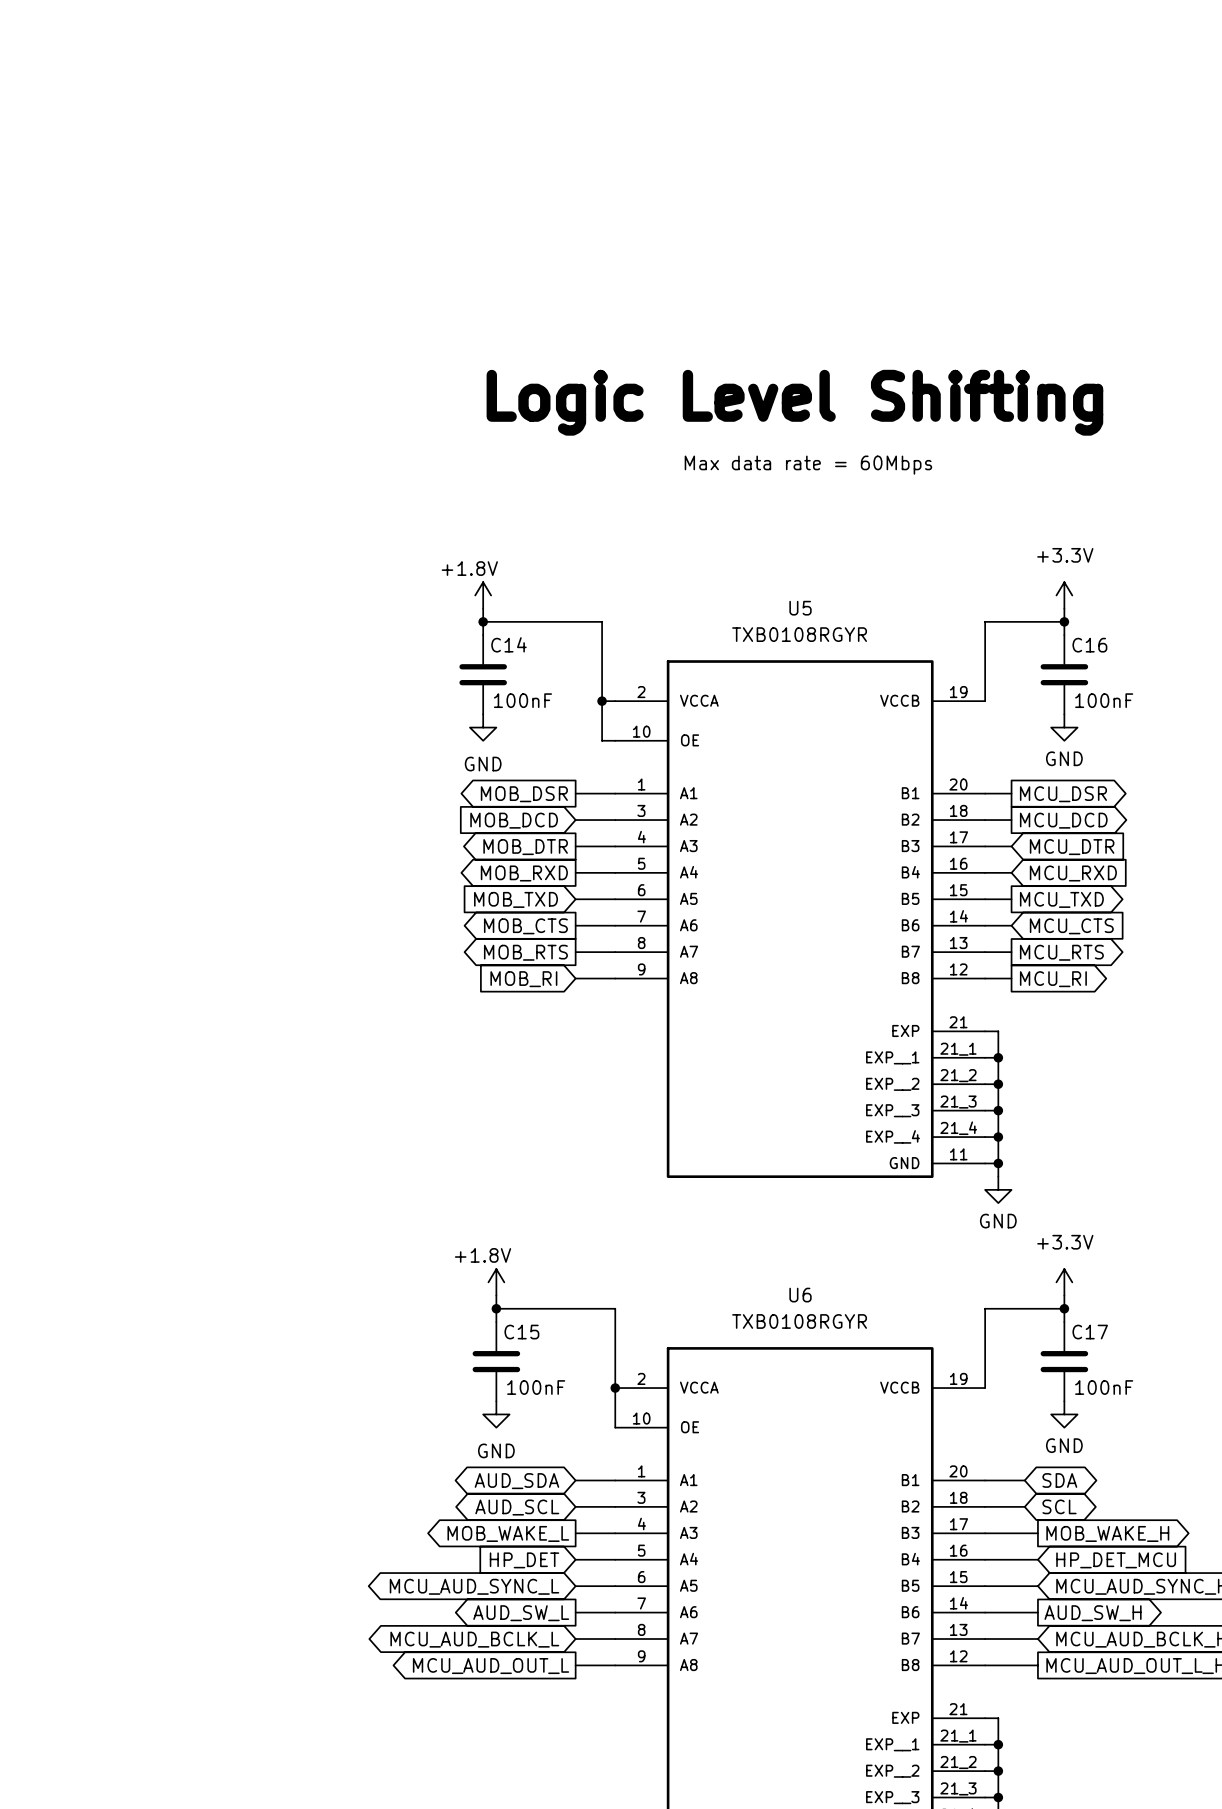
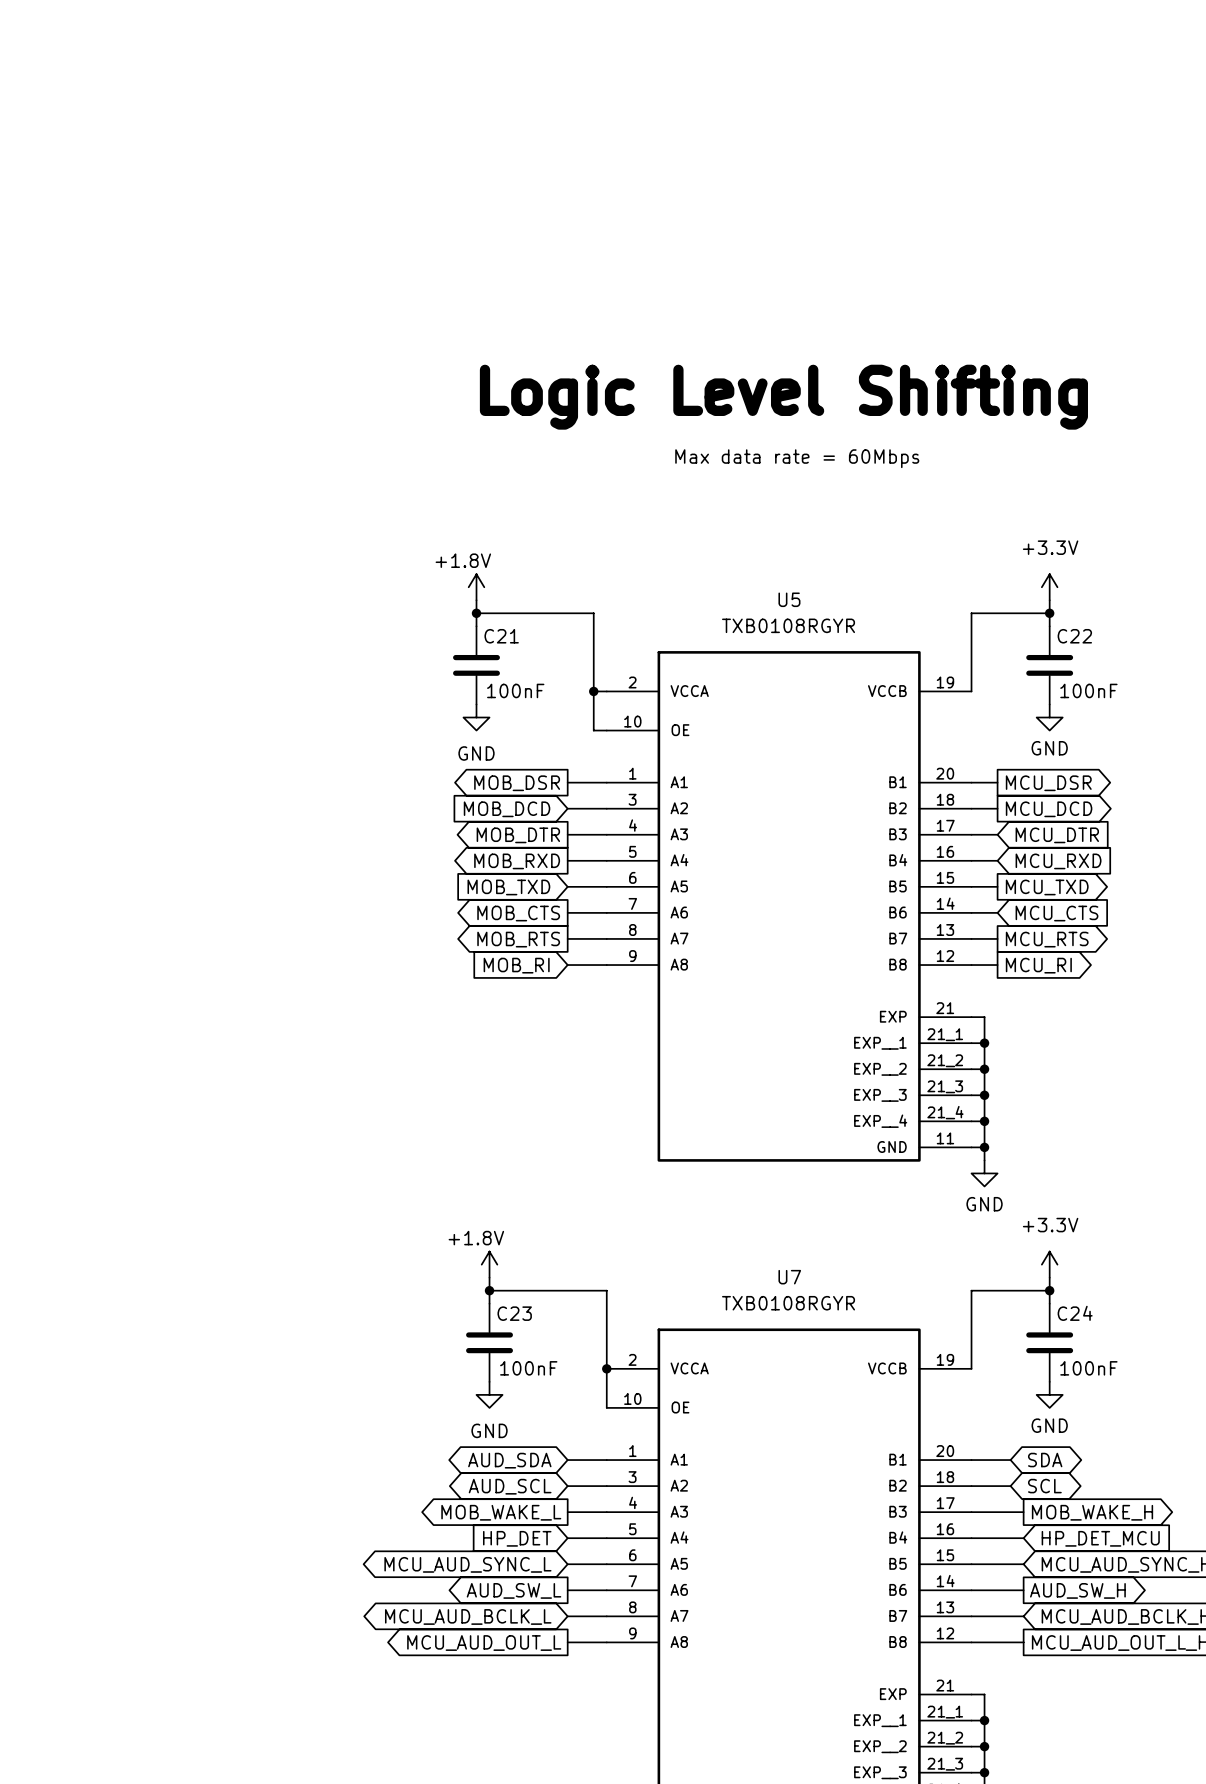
C14 name: C14 (509, 644) -> C21 (501, 636)
C16 name: C16 (1089, 645) -> C22 (1074, 636)
U6 name: U6 (800, 1295) -> U7 (789, 1277)
C15 name: C15 (521, 1332) -> C23 (514, 1313)
C17 name: C17 (1090, 1332) -> C24 (1075, 1313)

